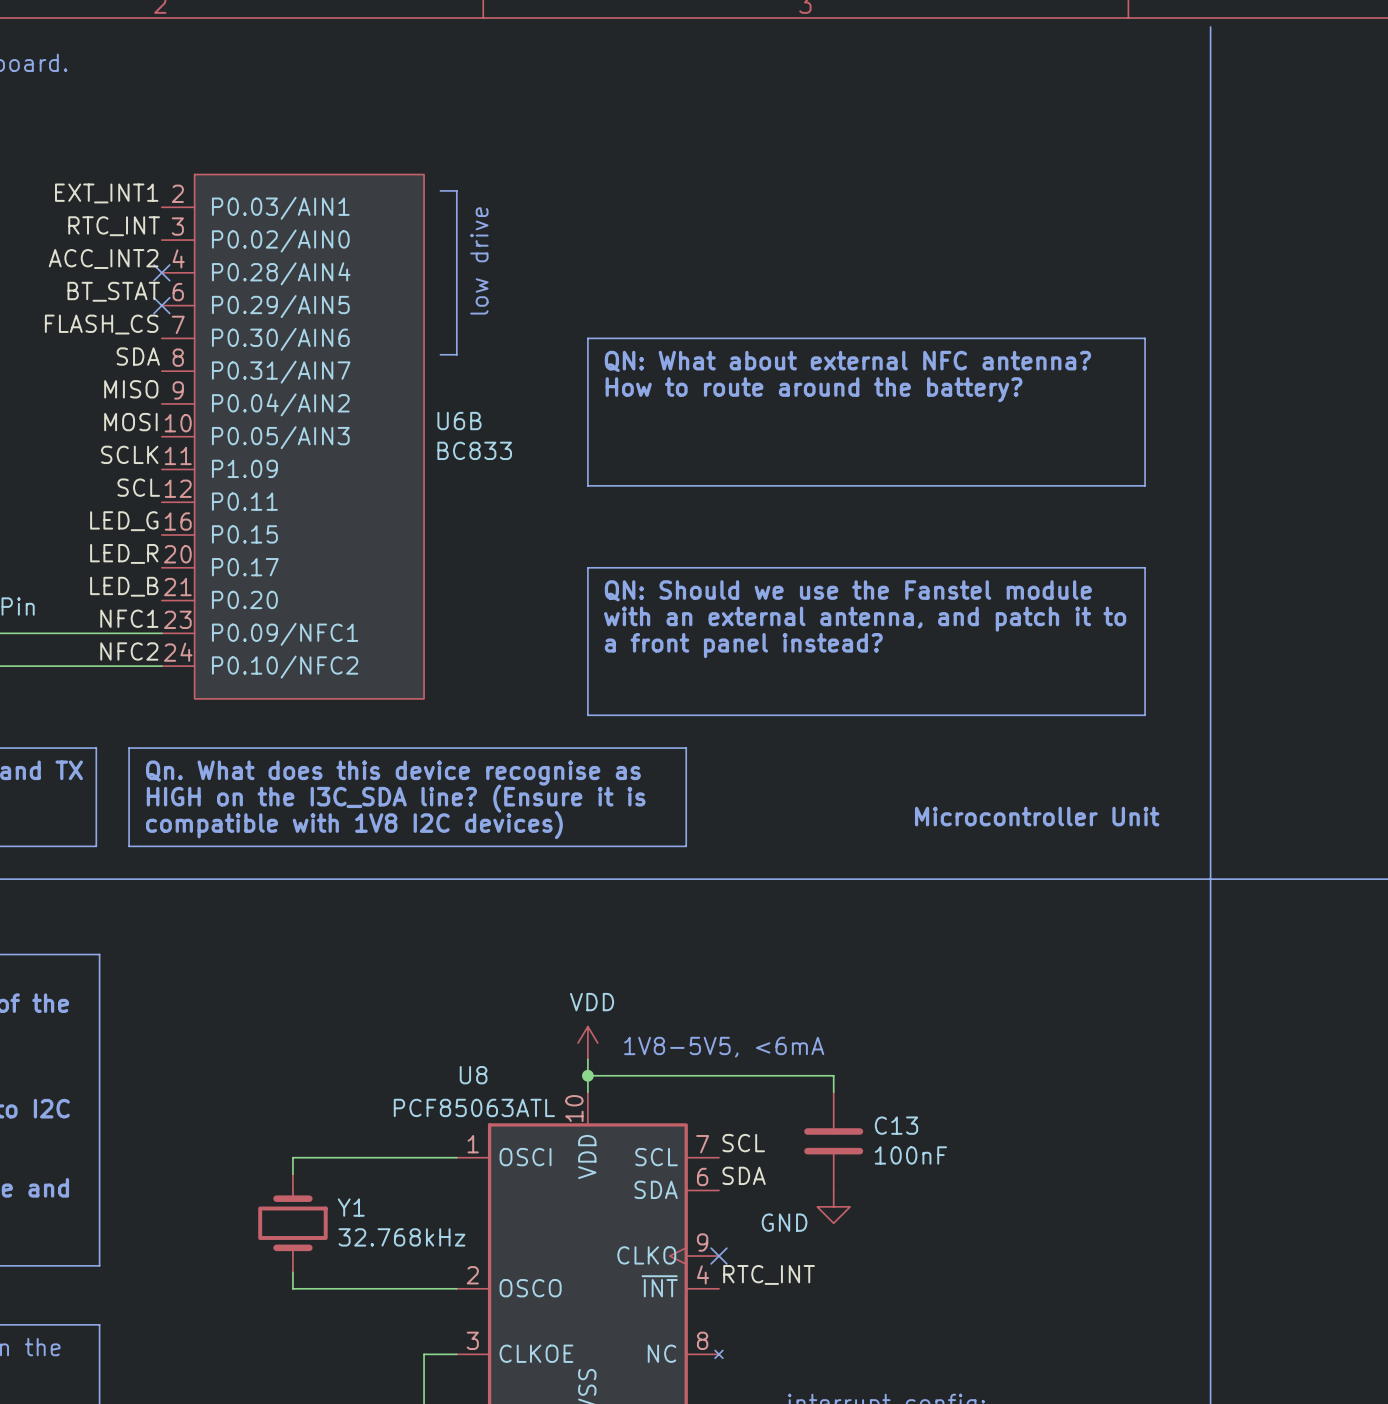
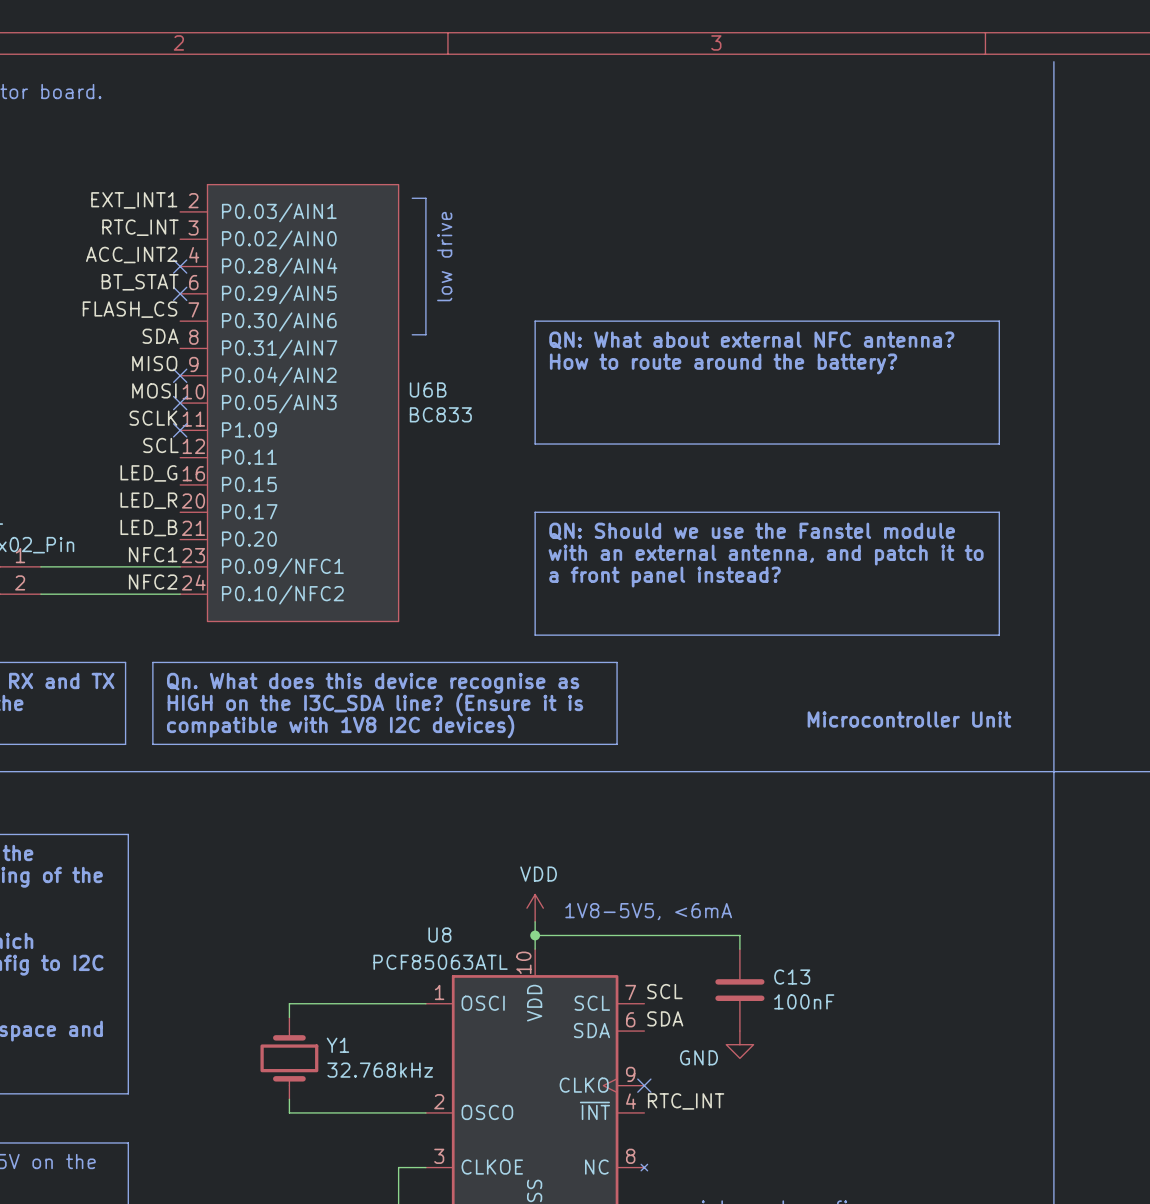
no-connect mark: none -> (180, 375)
no-connect mark: none -> (180, 403)
no-connect mark: none -> (180, 430)

